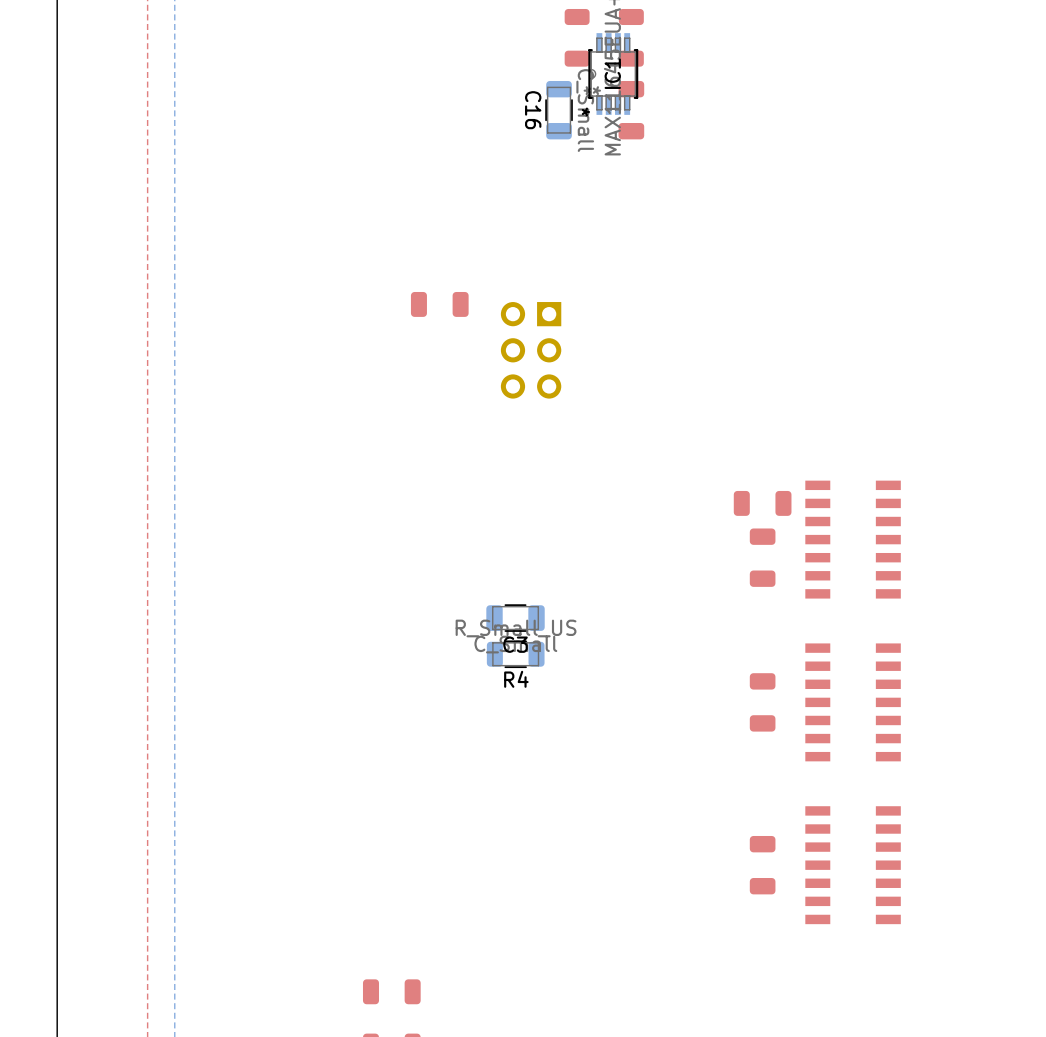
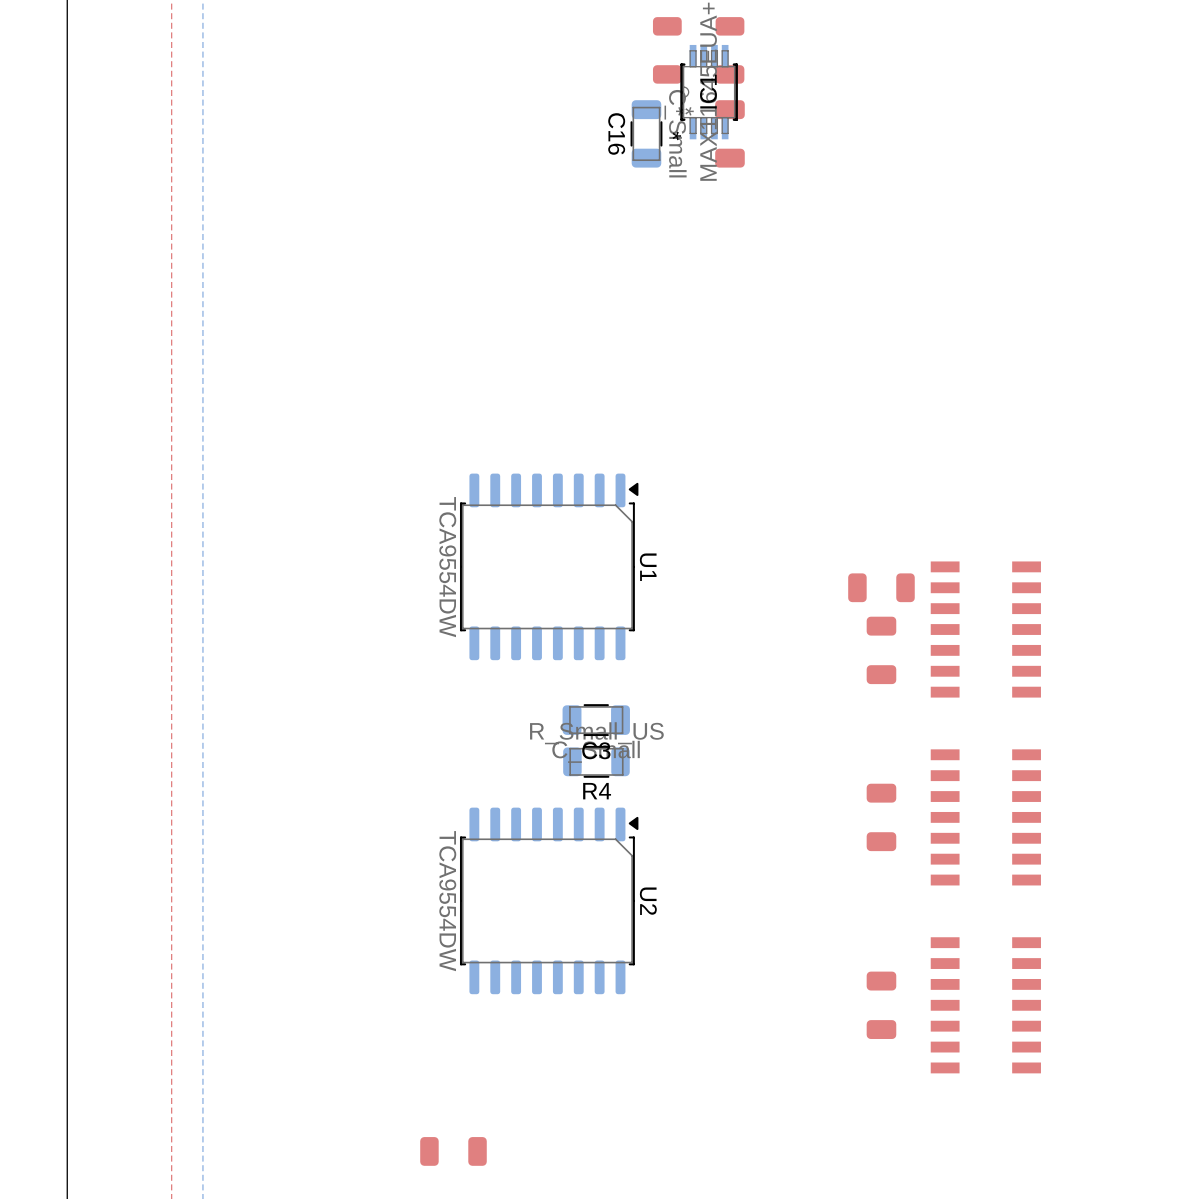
part: (439, 304) -> none
part: (531, 350) -> none
U1: none -> TCA9554DW (549, 566)
U2: none -> TCA9554DW (549, 900)

